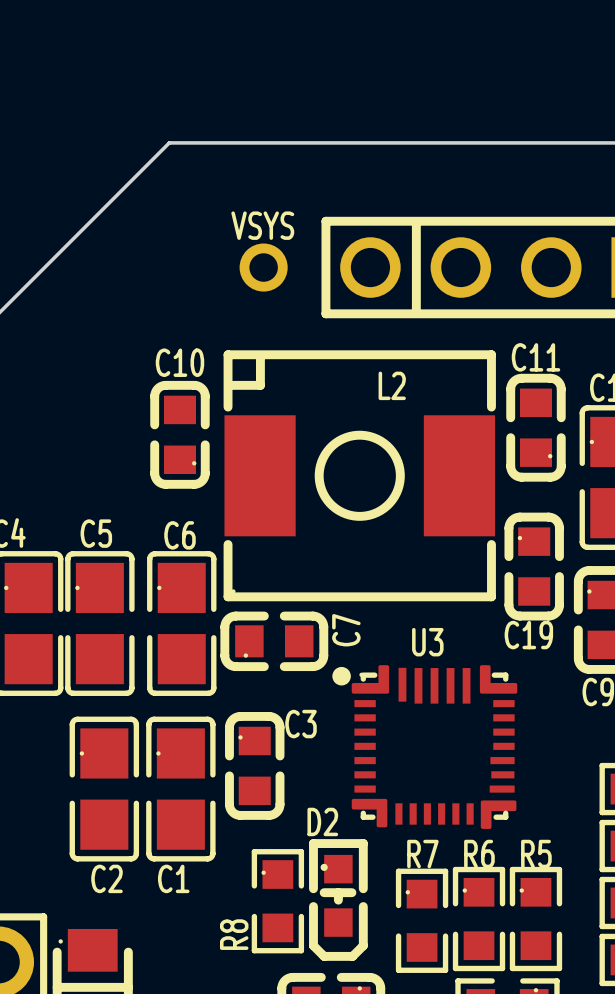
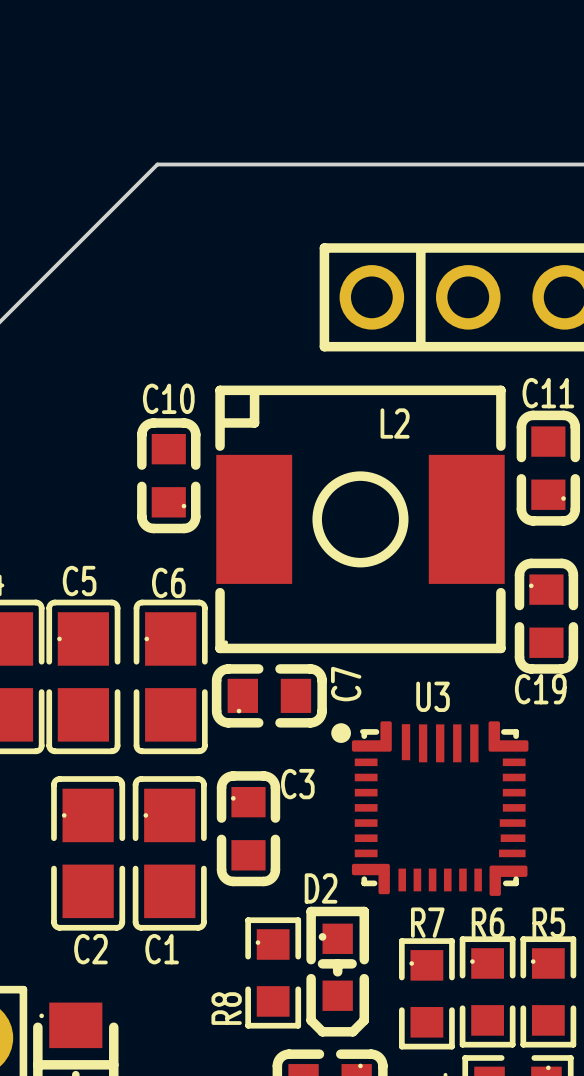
part: VSYS (263, 267) -> none

